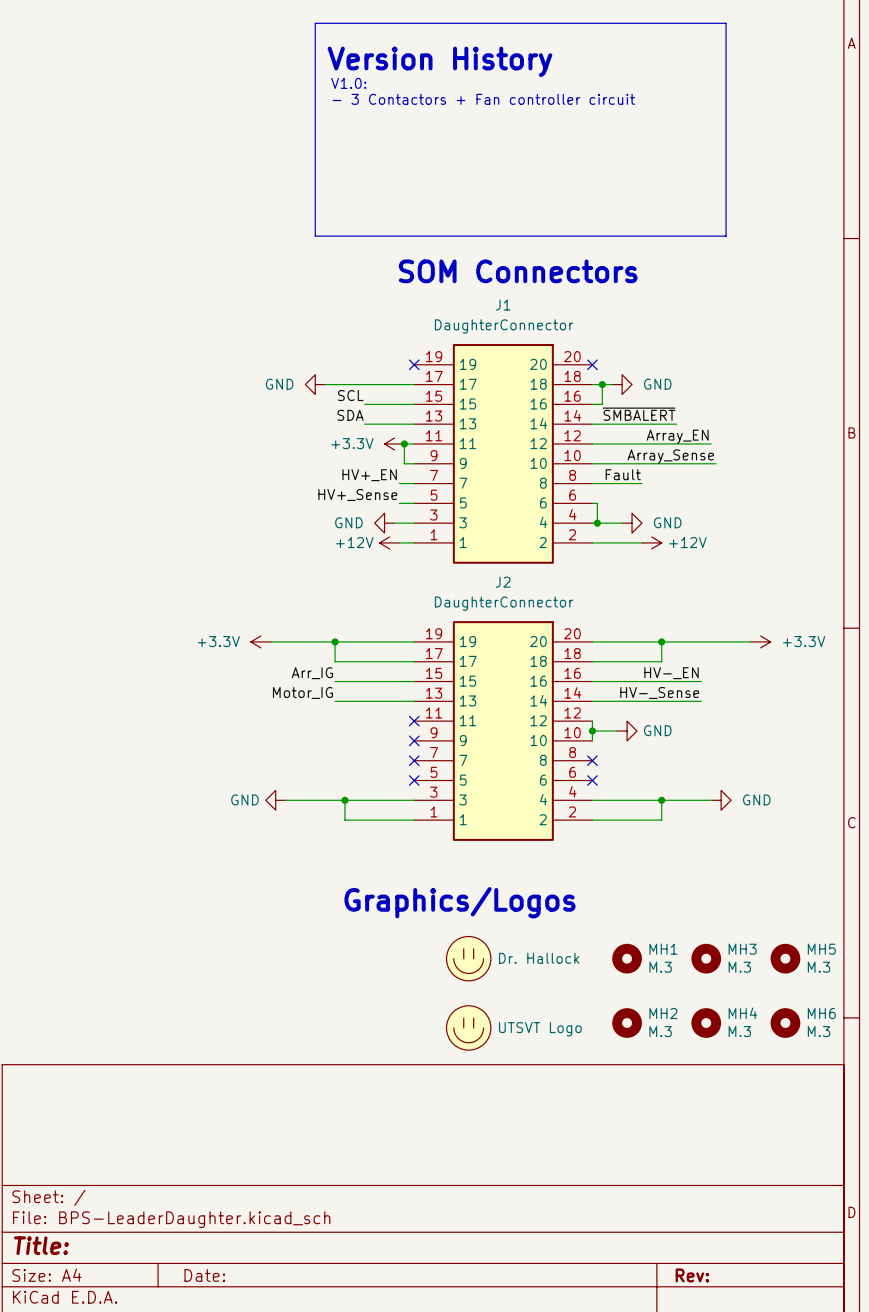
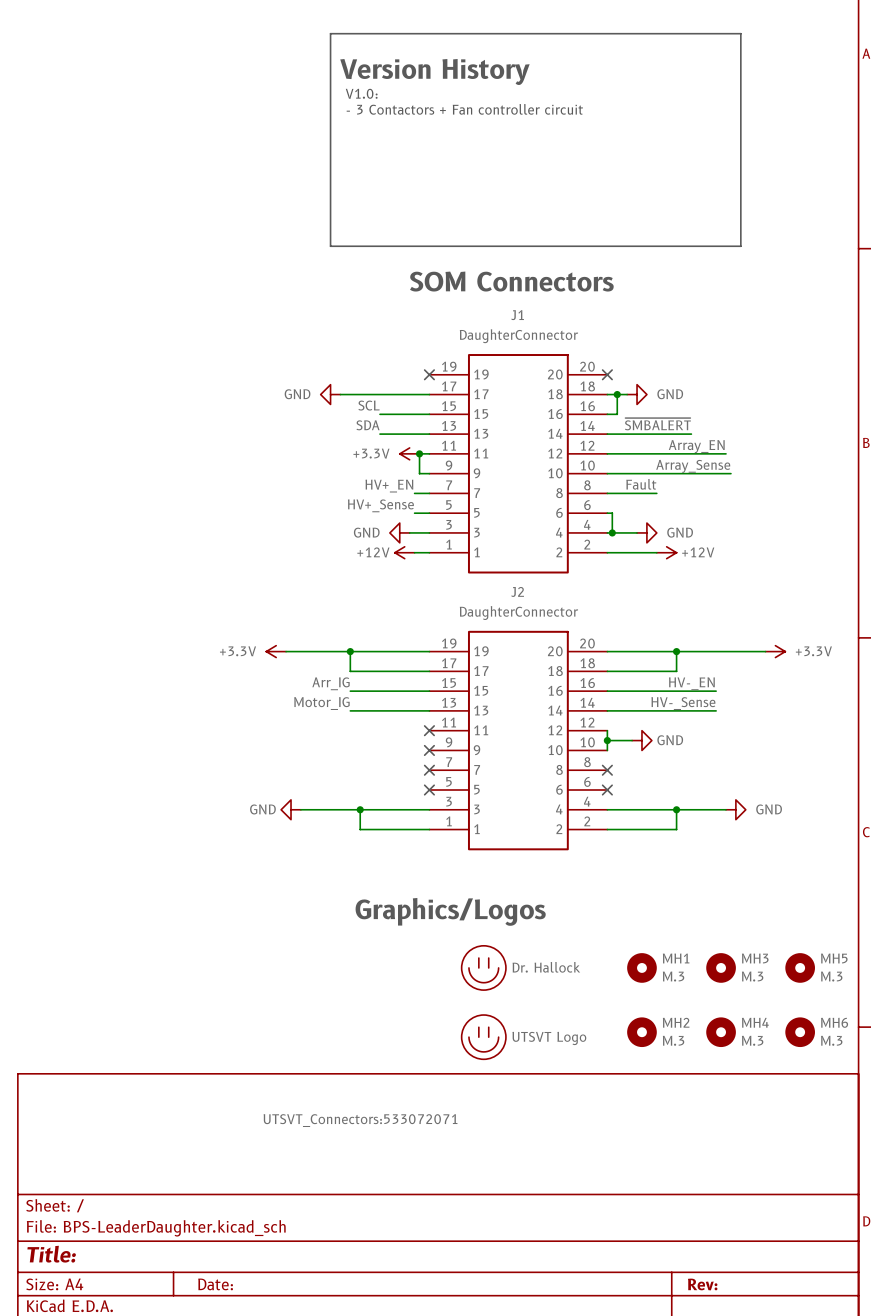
J1 text: none -> UTSVT_Connectors:533072071 (360, 1120)

